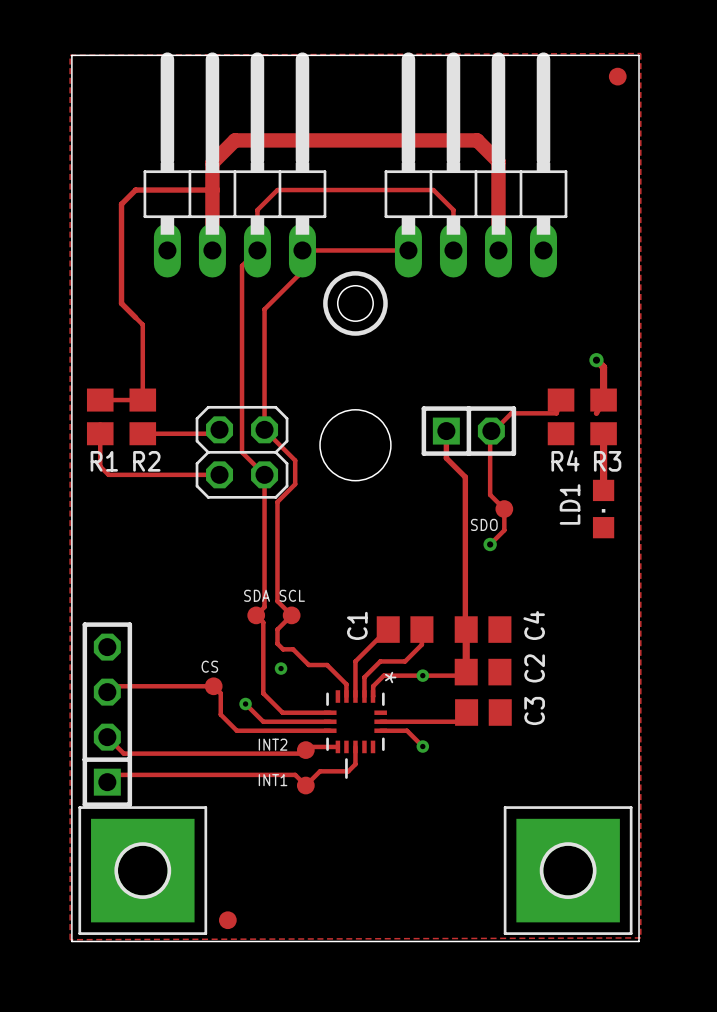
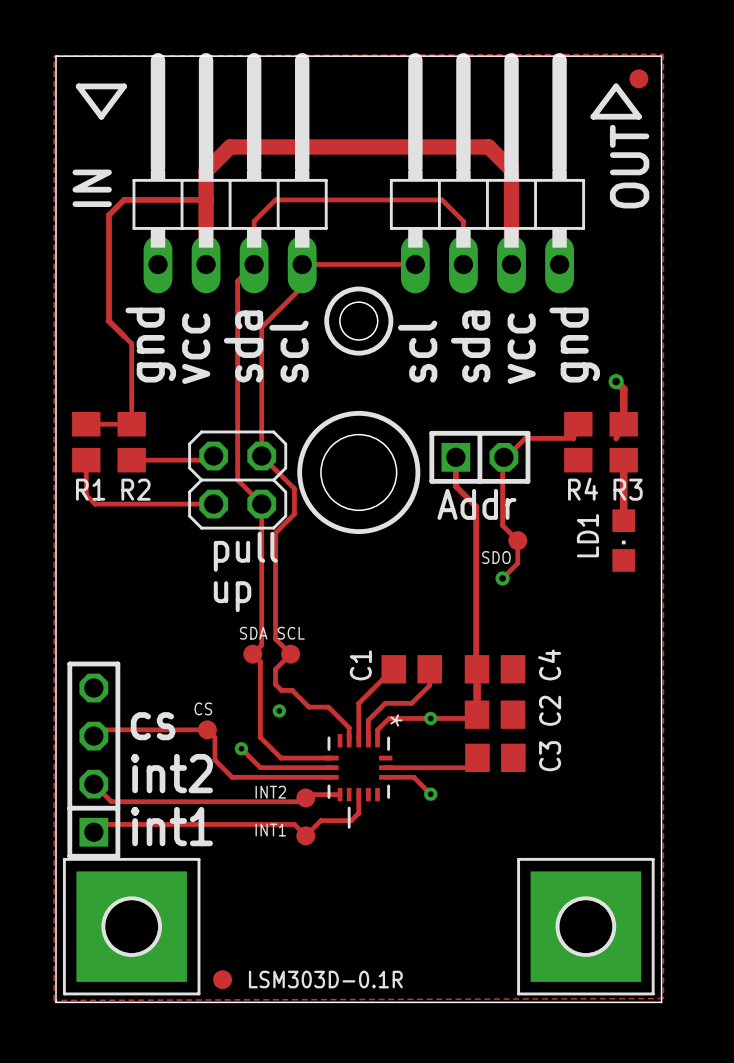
line: none -> (78, 86) (124, 86) (101, 116) (78, 86)
line: none -> (616, 86) (593, 116) (638, 116) (616, 86)
text: none -> OUT (629, 166)
text: none -> IN (92, 188)
text: none -> gnd (150, 345)
text: none -> gnd (574, 345)
text: none -> sda (243, 346)
text: none -> sda (470, 346)
text: none -> vcc (196, 348)
text: none -> vcc (521, 348)
text: none -> scl (288, 351)
text: none -> scl (417, 351)
drawing: none -> [297, 410, 421, 535]
text: none -> Addr (476, 504)
text: none -> pull (245, 551)
text: none -> up (232, 596)
text: none -> cs (153, 726)
text: none -> int2 (171, 773)
text: none -> int1 (171, 826)
text: none -> LSM303D-0.1R (325, 979)

